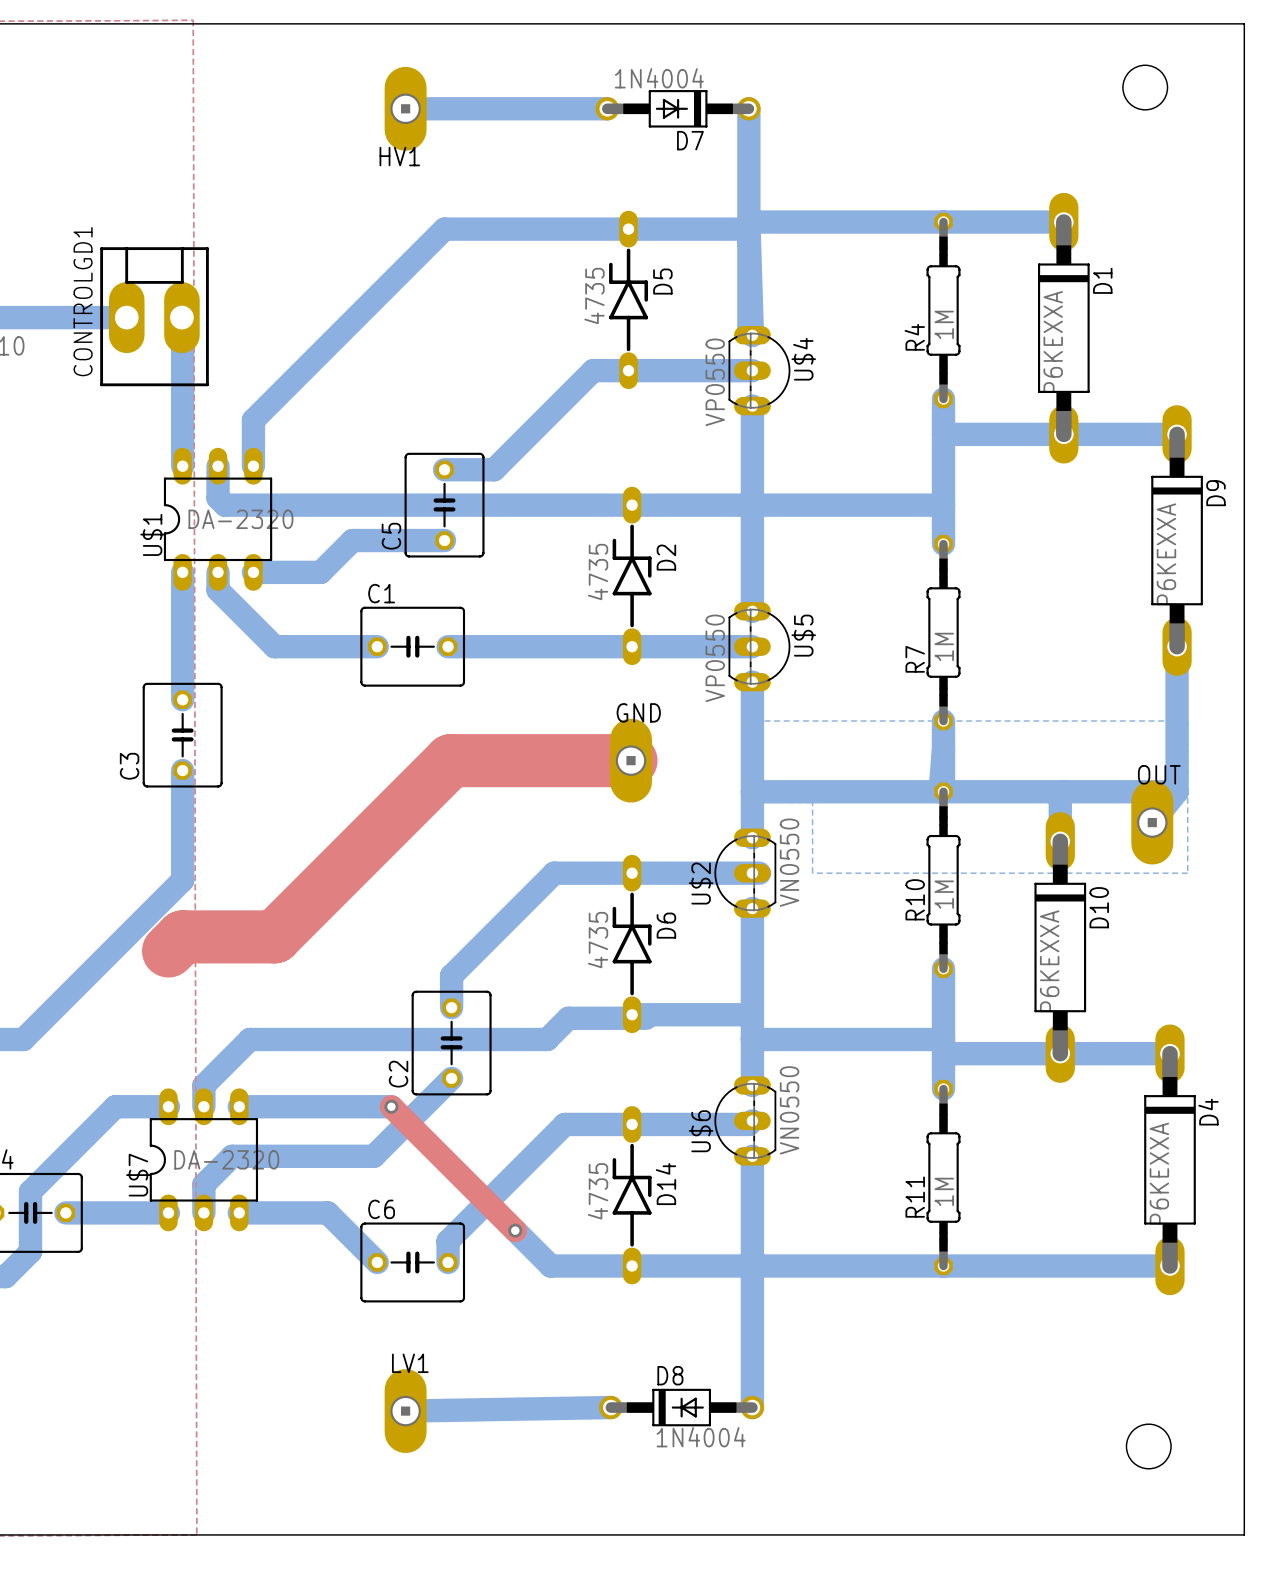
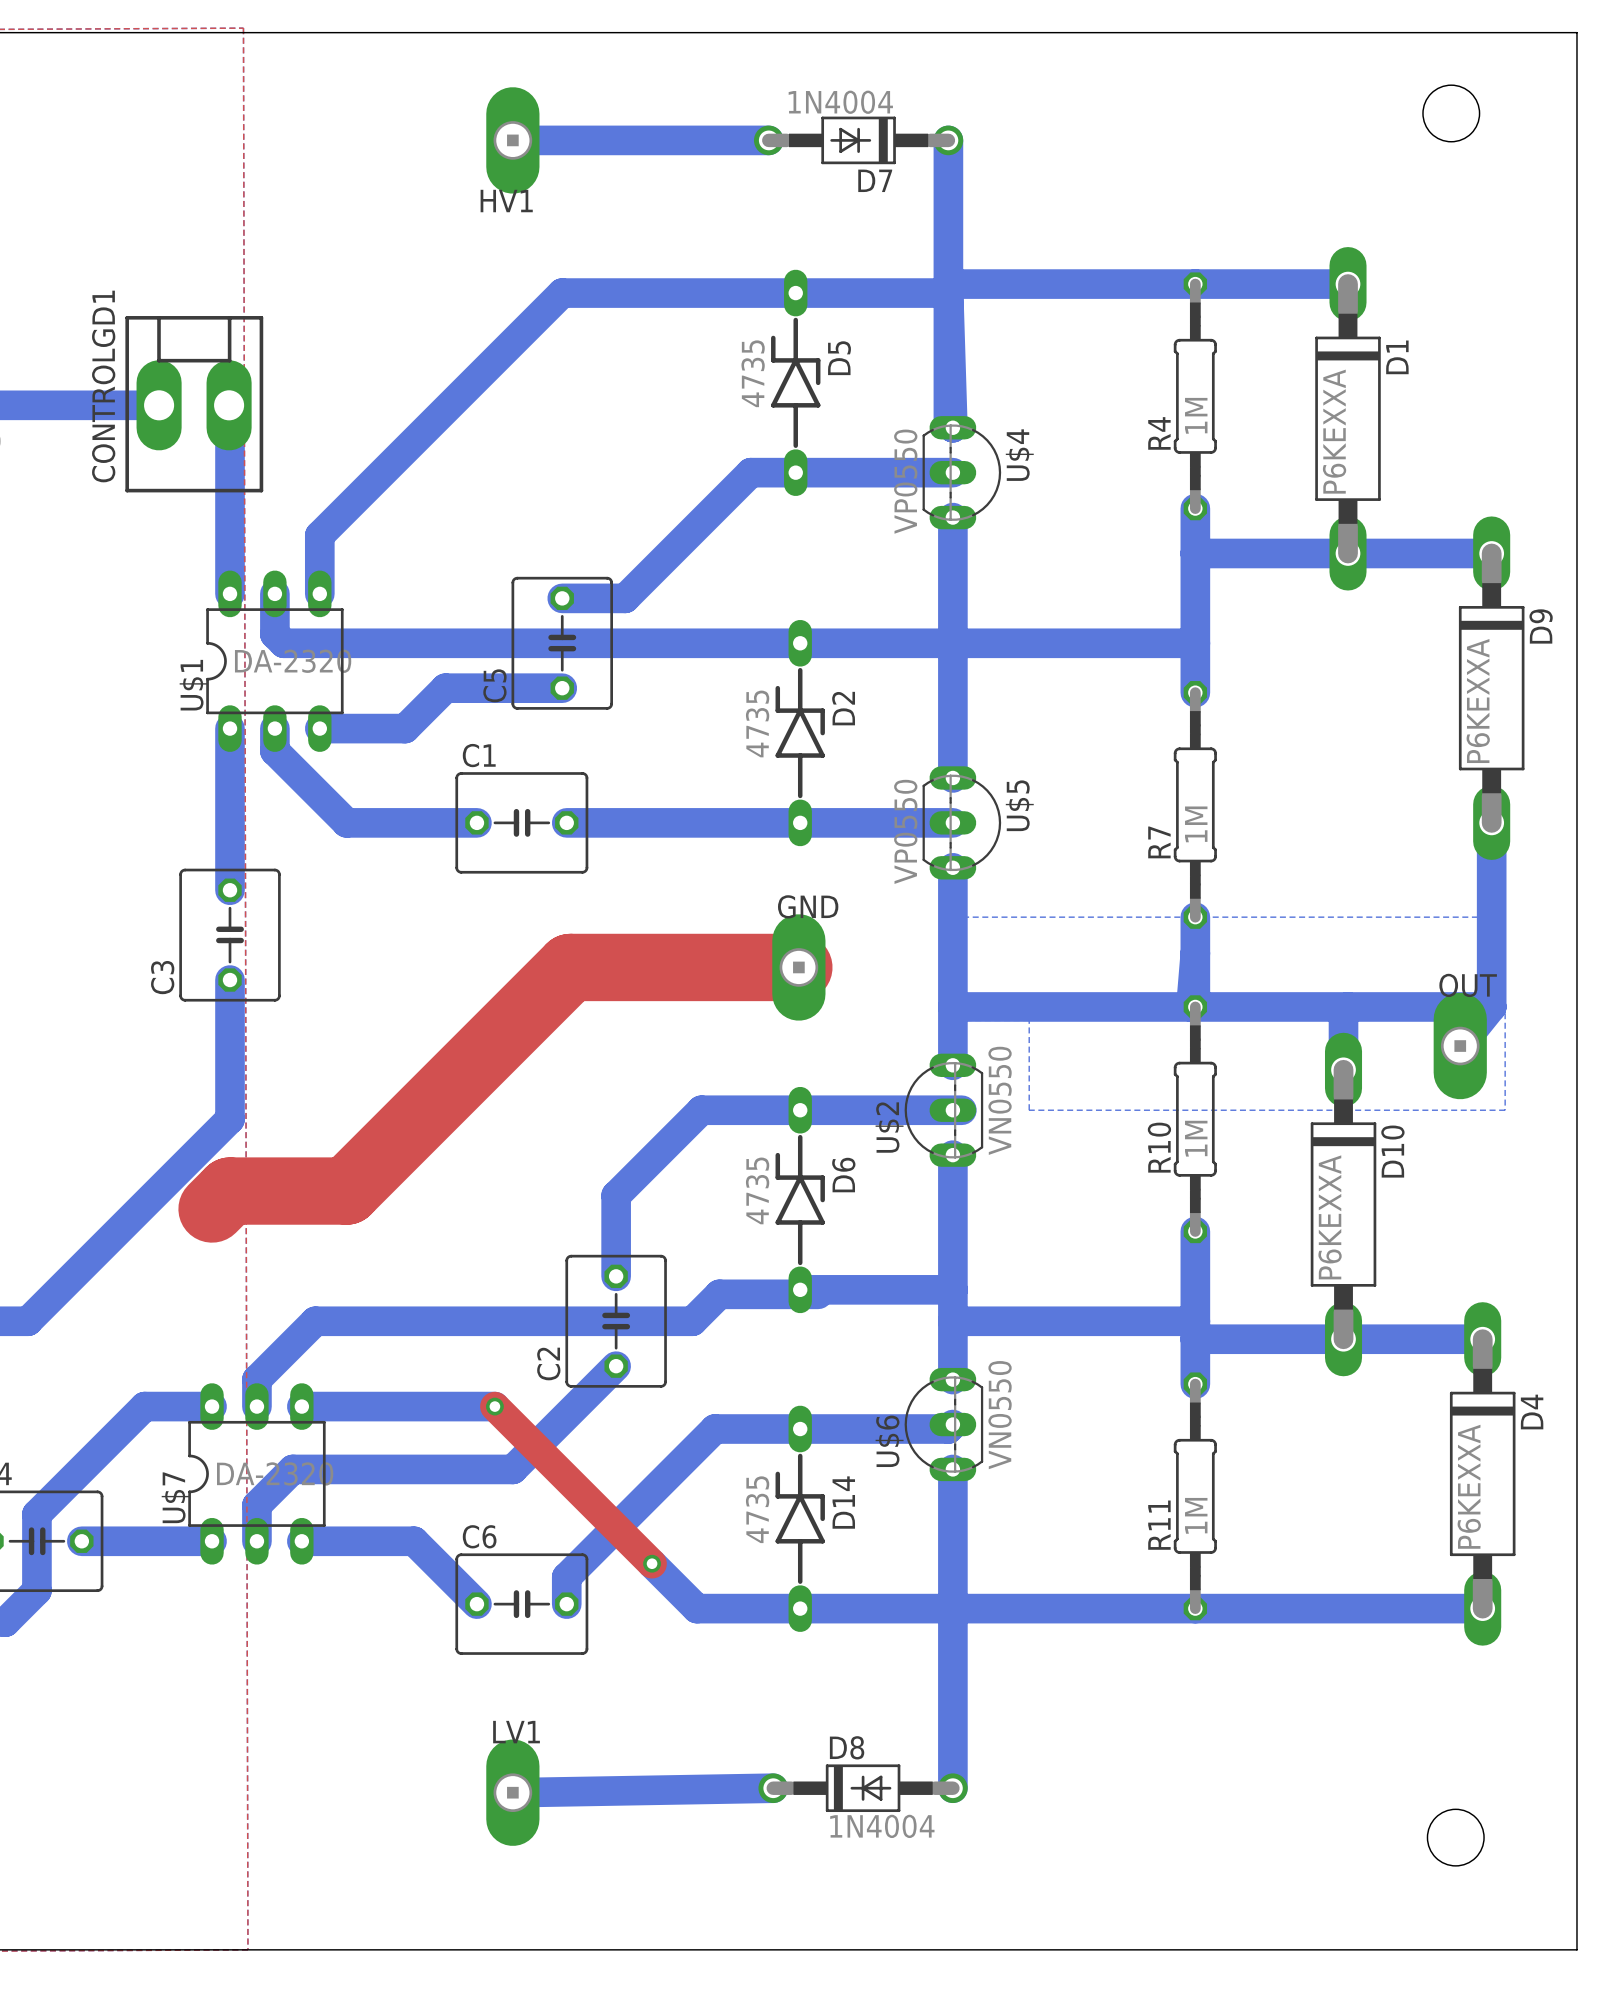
bottom track: (487, 940) (451, 975) (451, 1007) -> (616, 1195) (616, 1276)
C2 position: (451, 1043) -> (616, 1321)
bottom track: (451, 1078) (373, 1156) -> (616, 1366) (512, 1469) (472, 1469)

